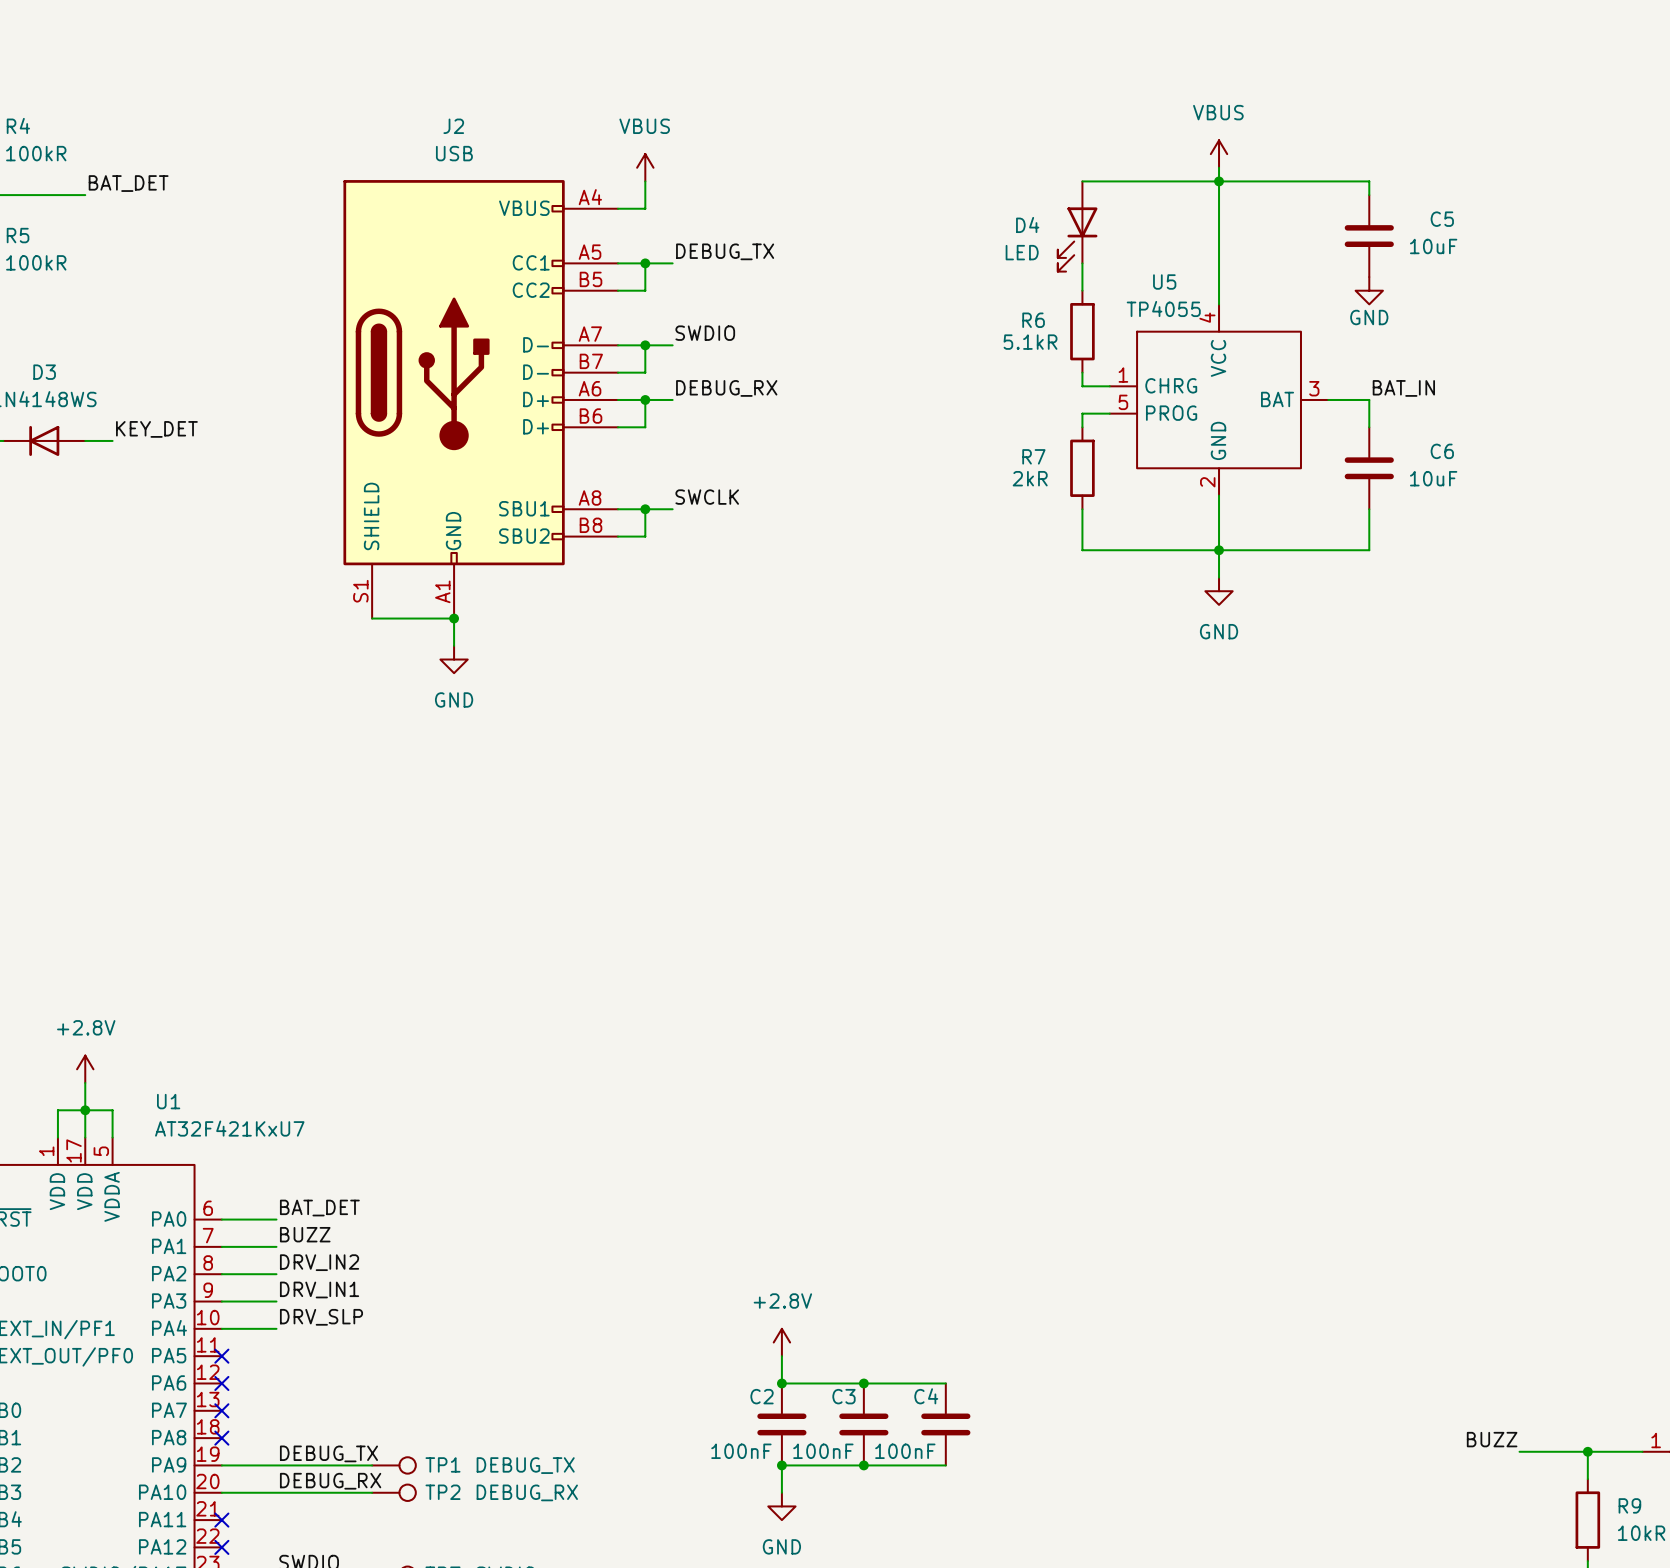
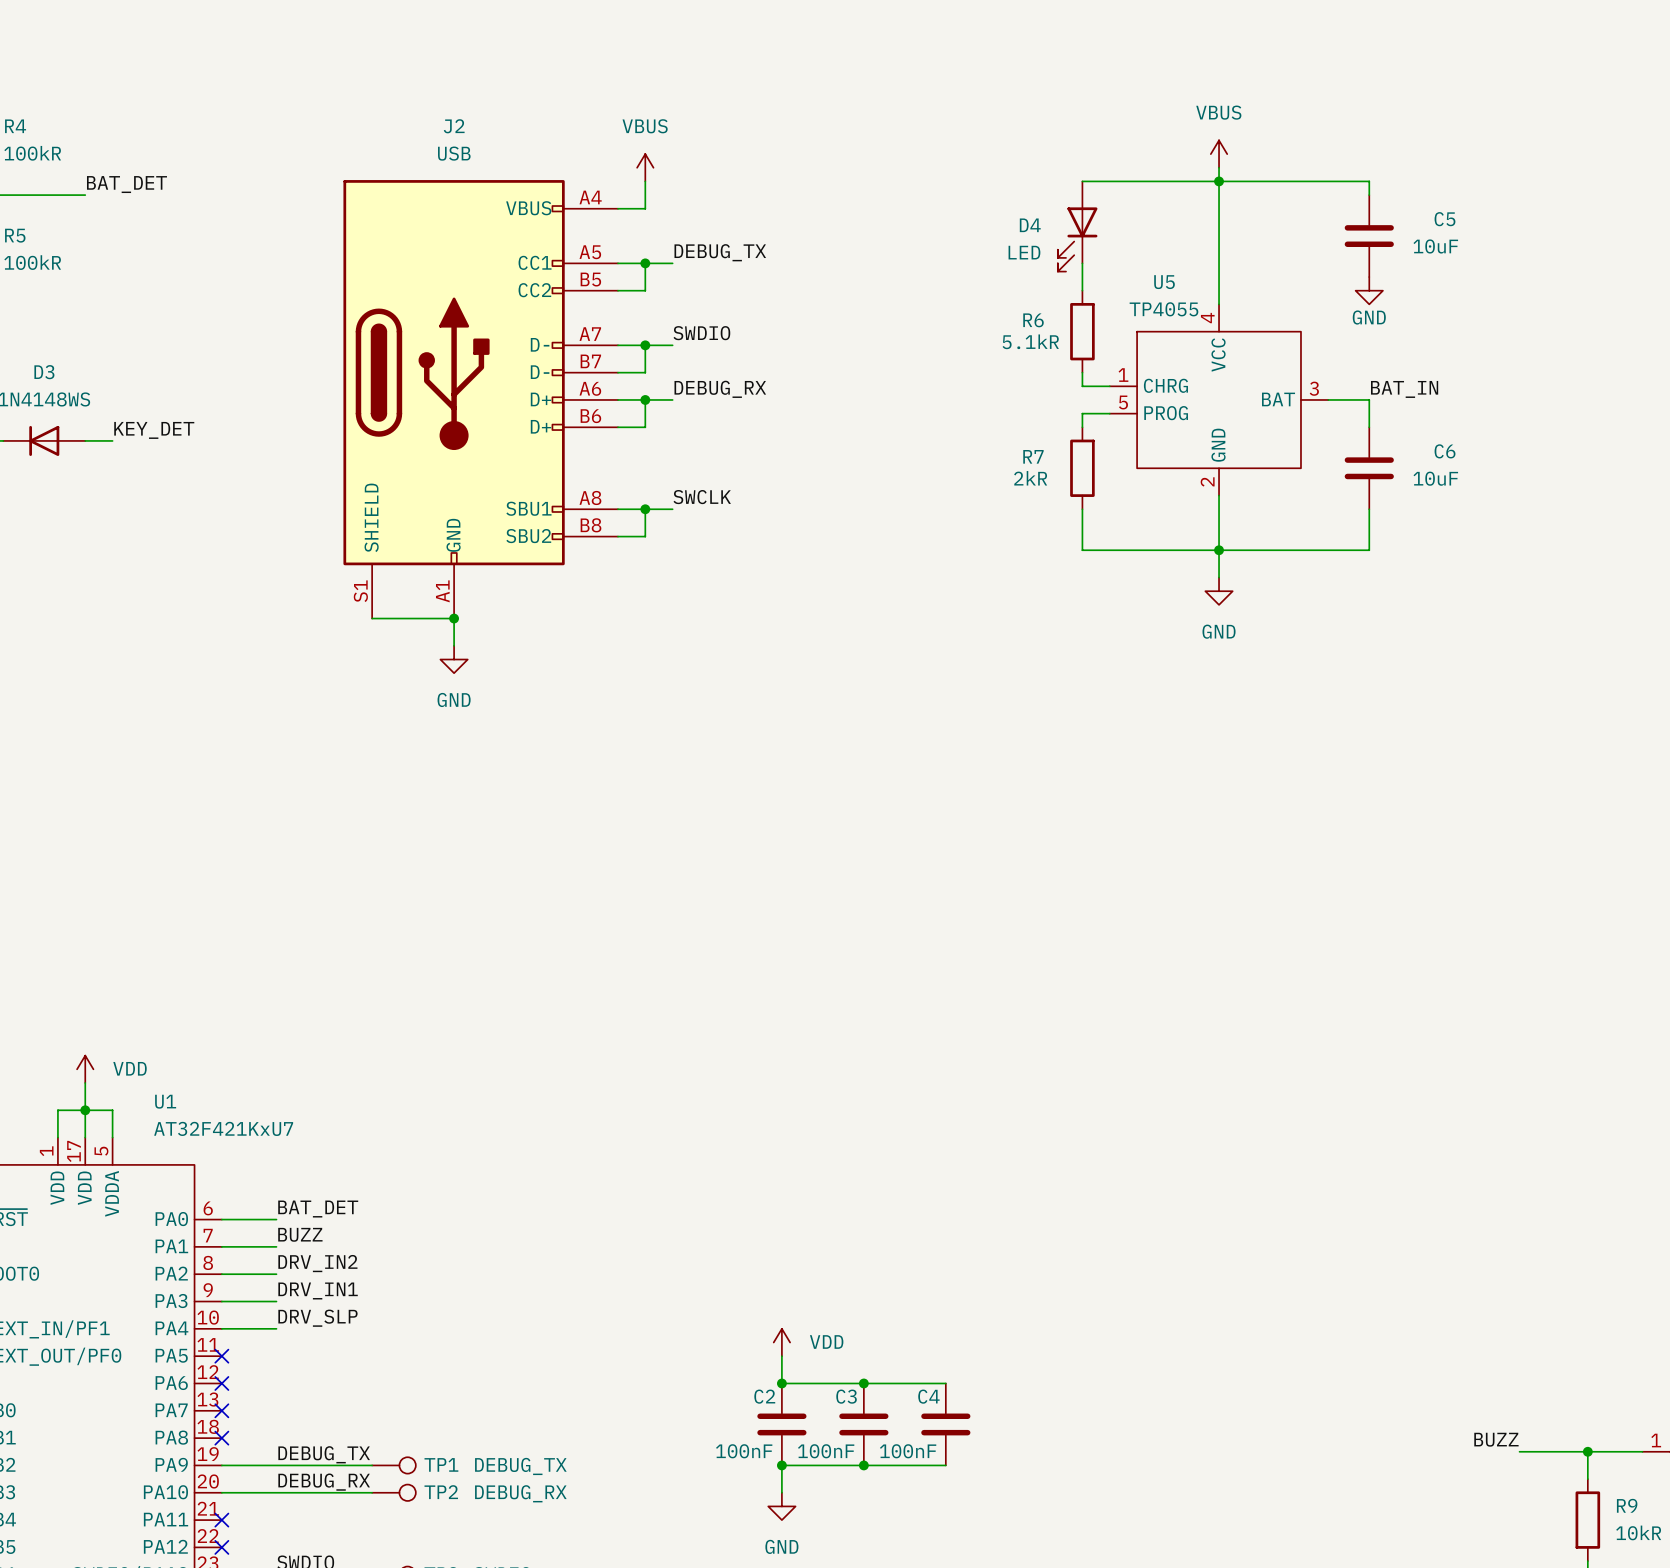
power symbol: +2.8V (85, 1069) -> VDD (85, 1069)
power symbol: +2.8V (781, 1342) -> VDD (781, 1342)

